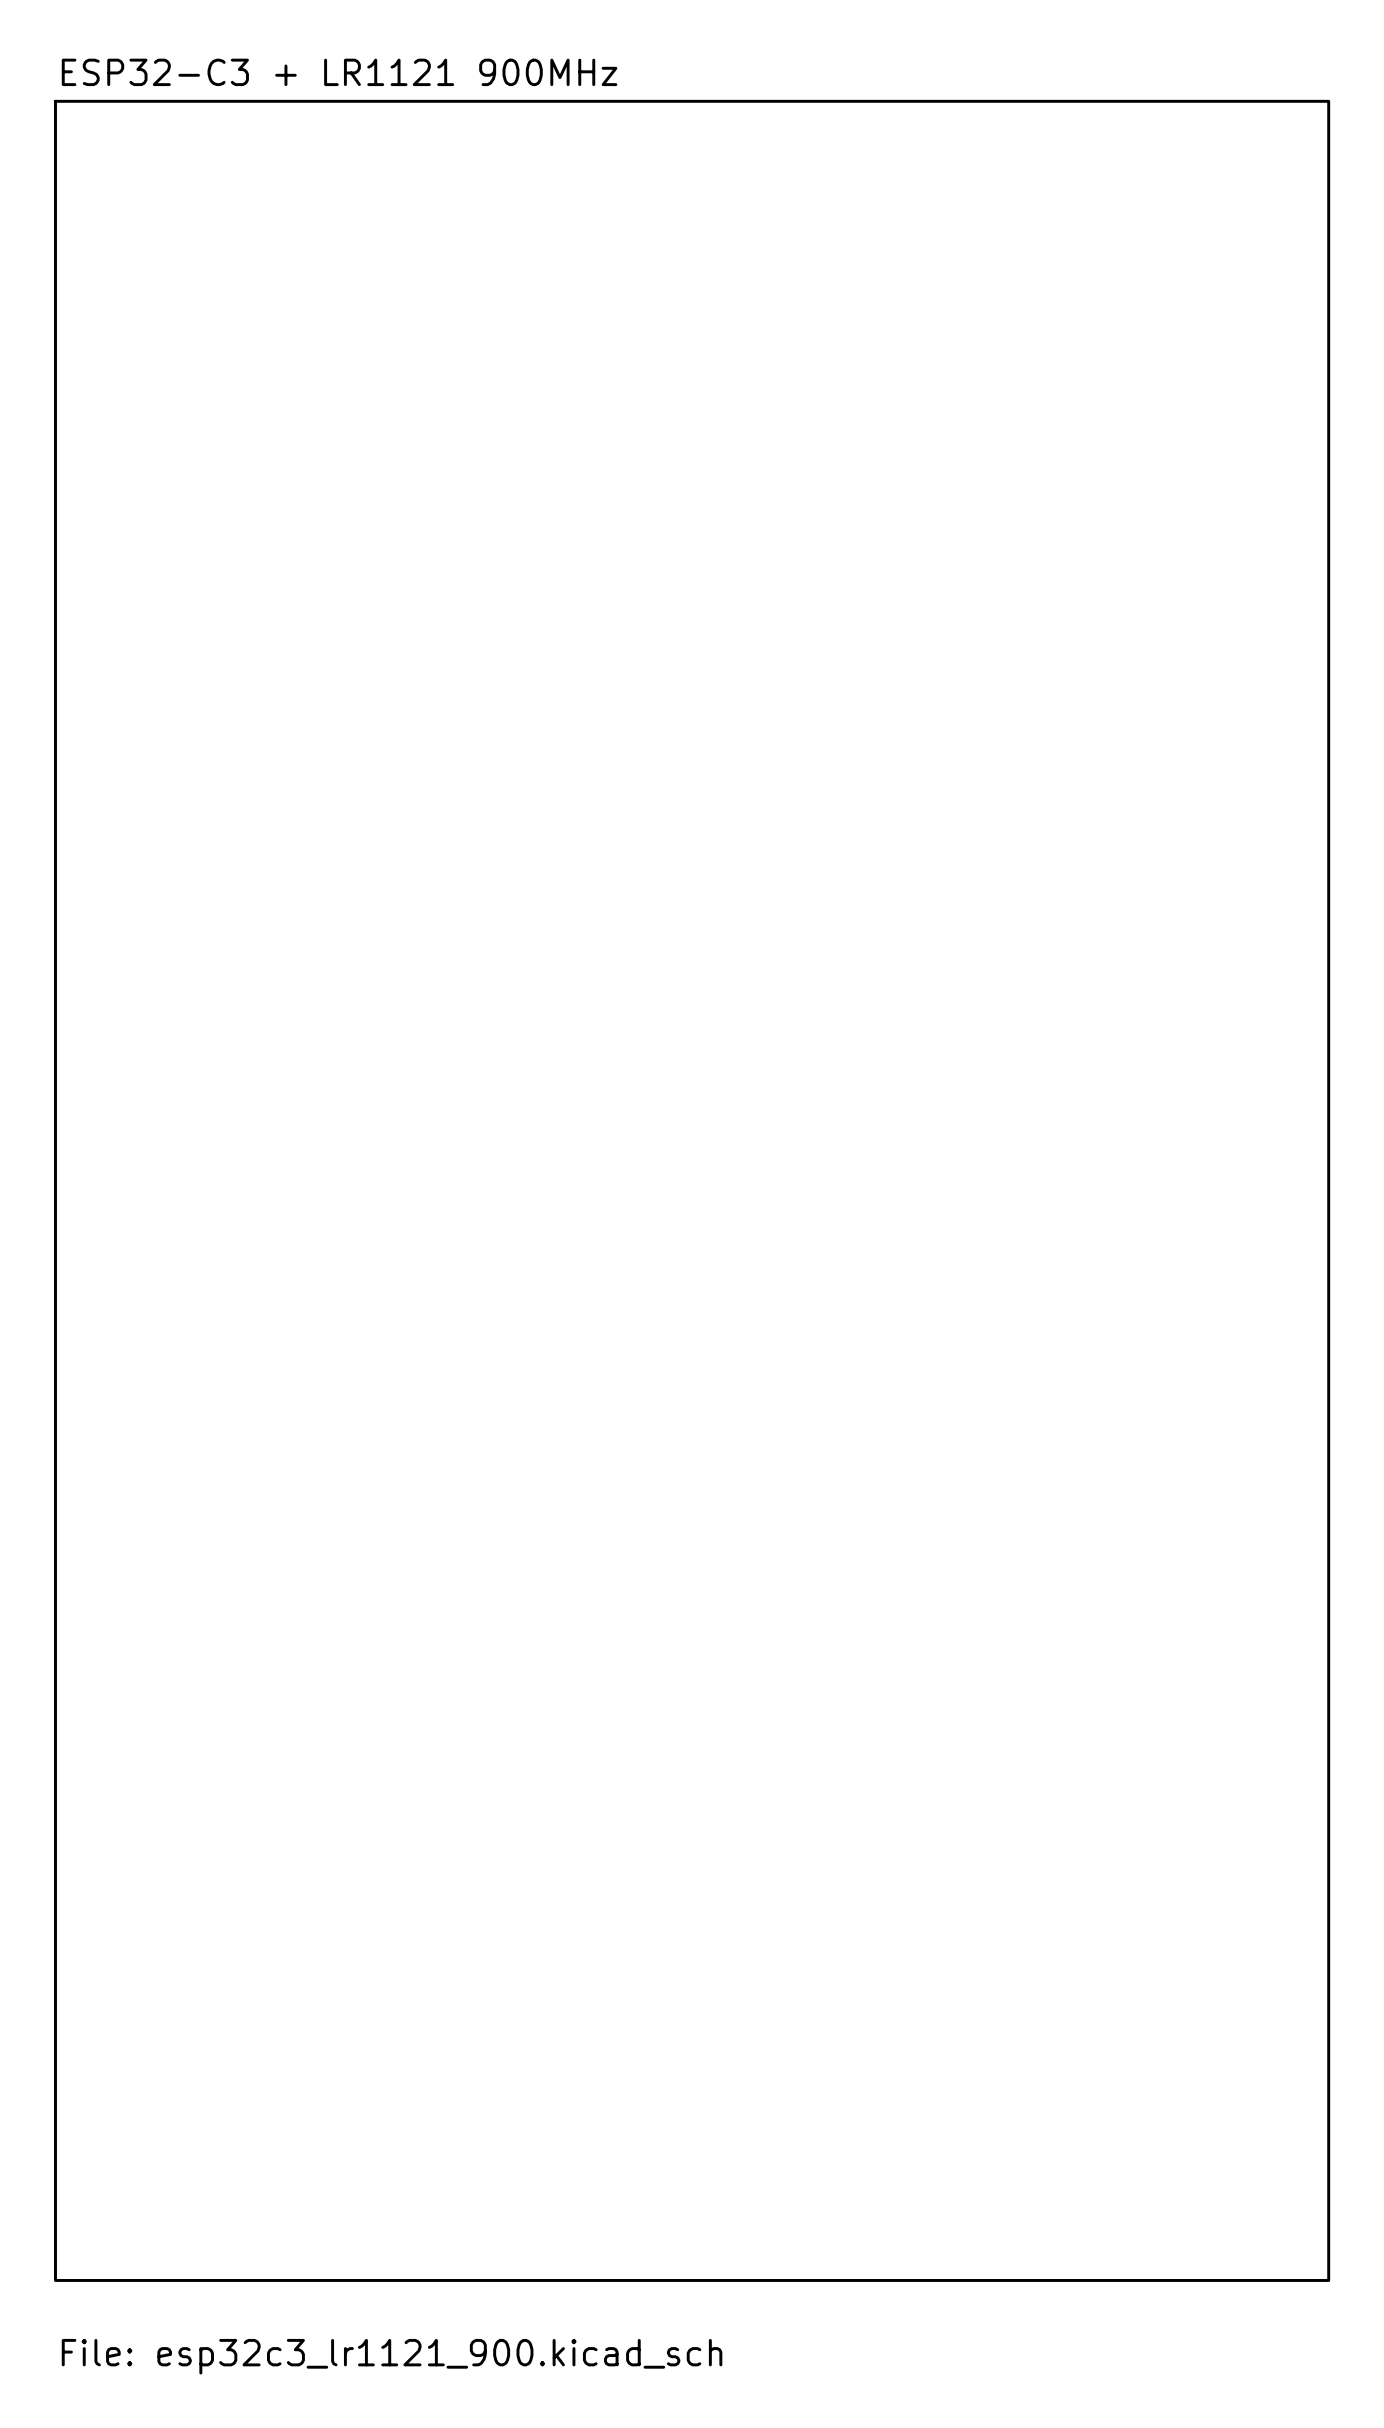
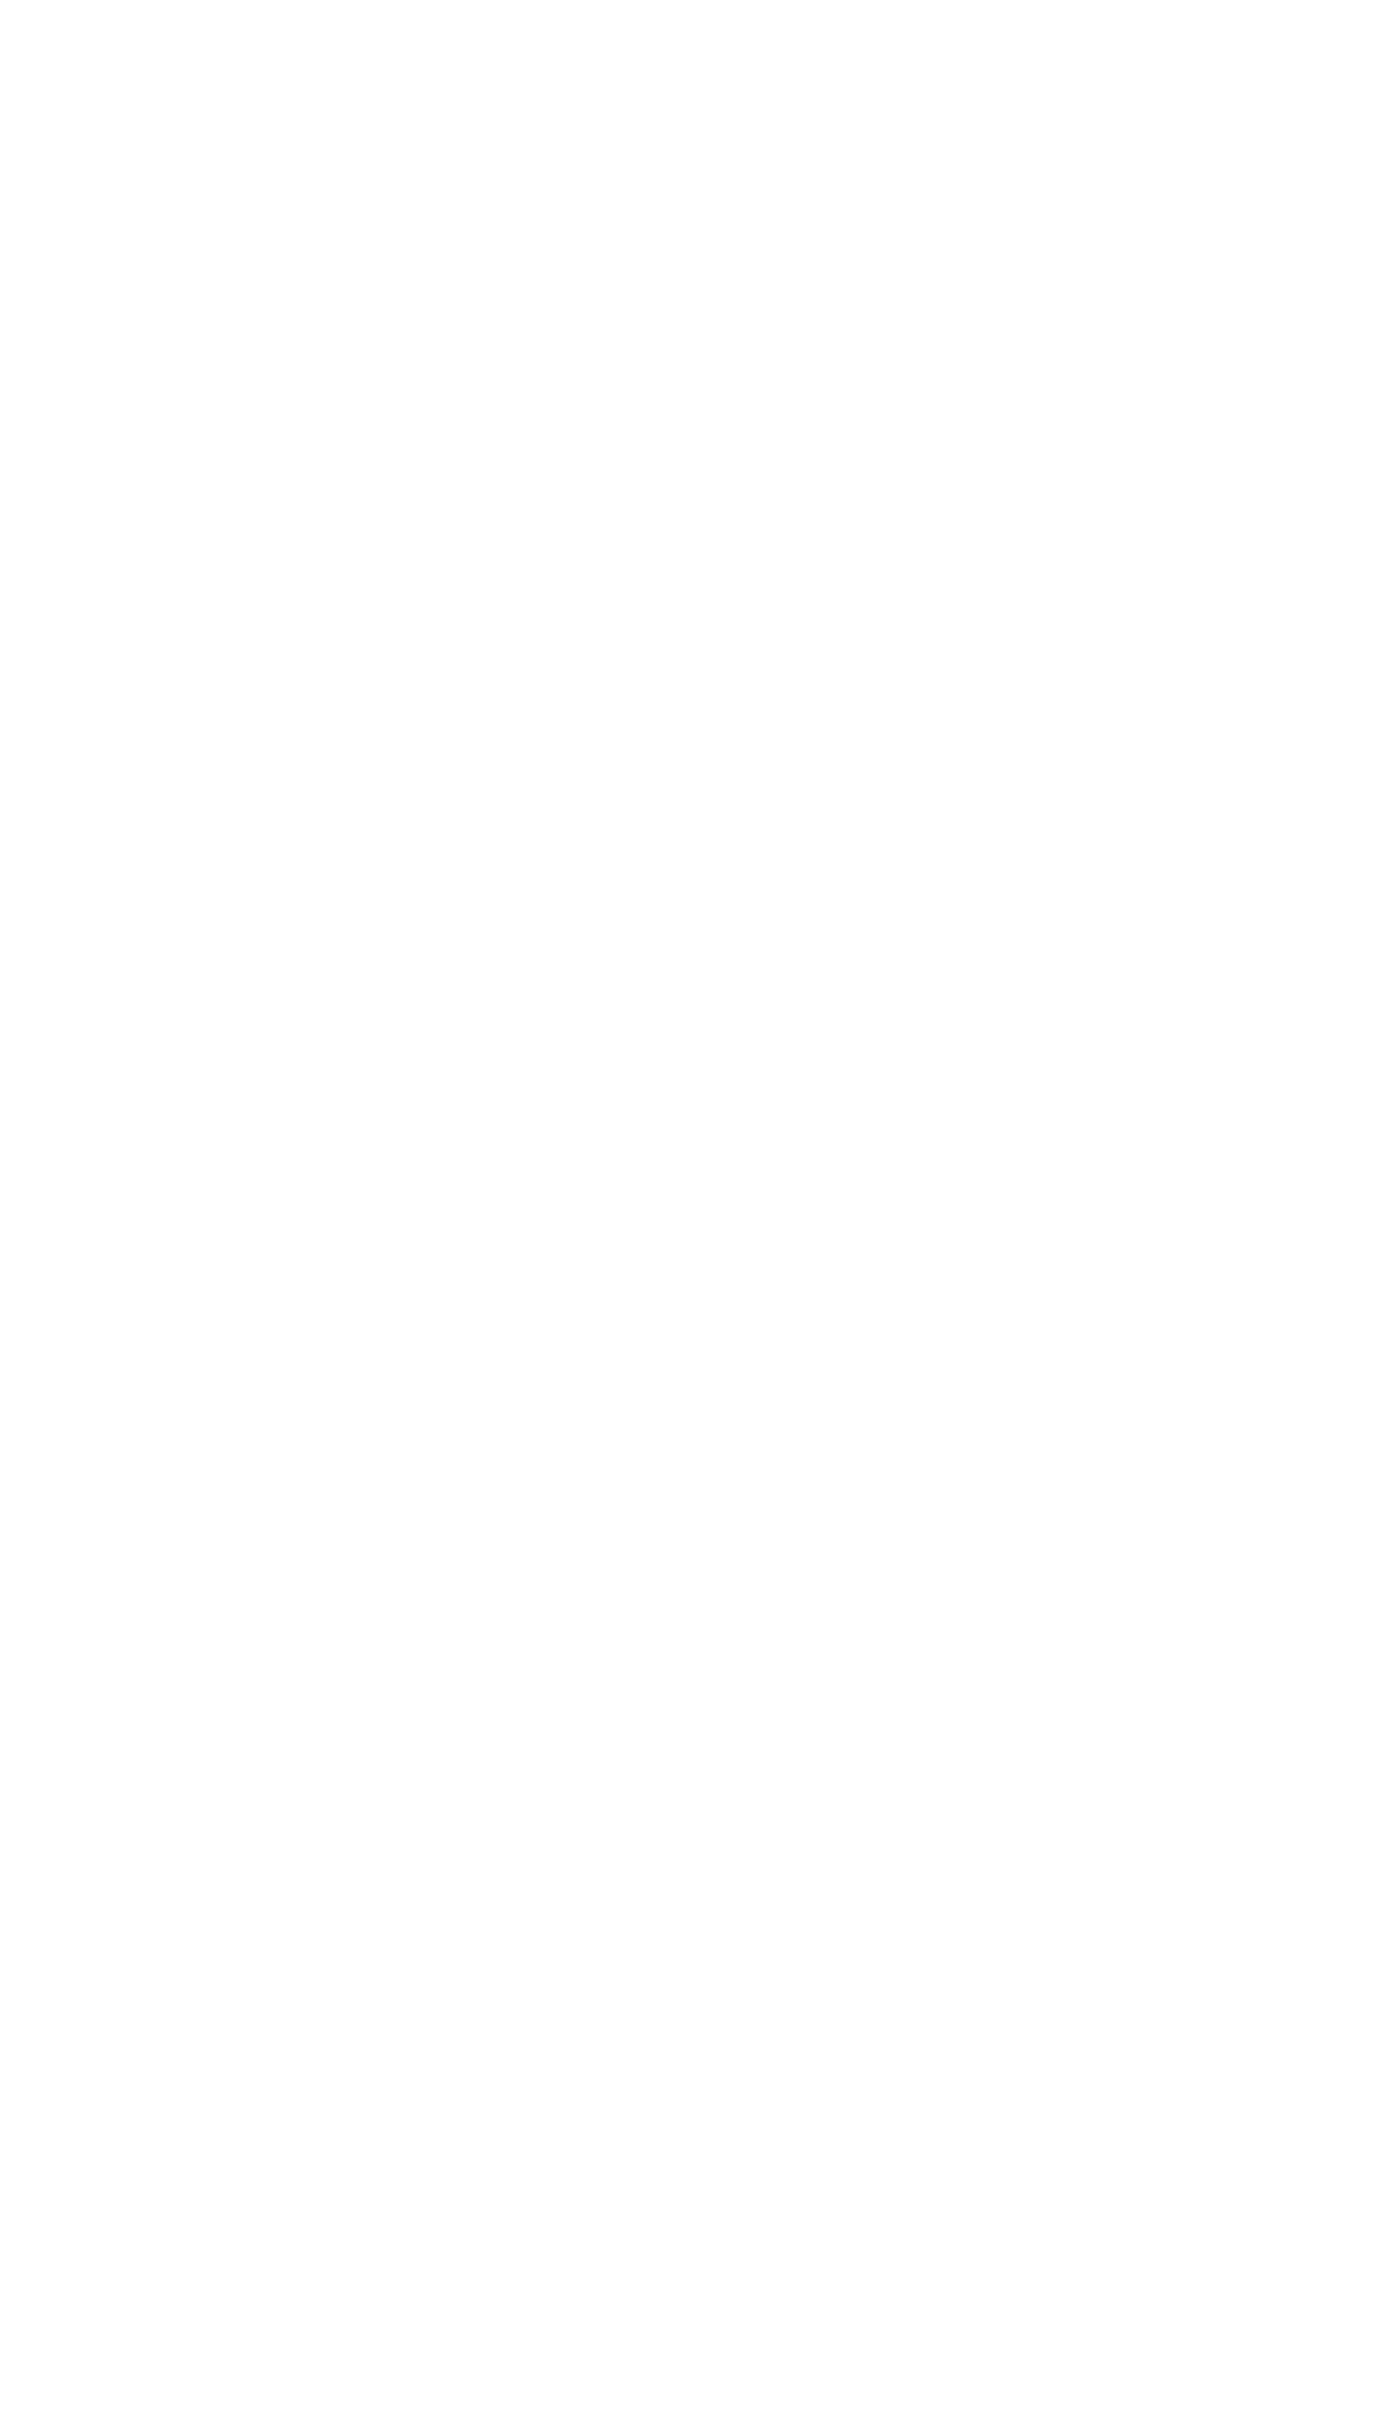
sheet ESP32-C3 + LR1121 900MHz: File: esp32c3_lr1121_900.kicad_sch (692, 1190) -> none

